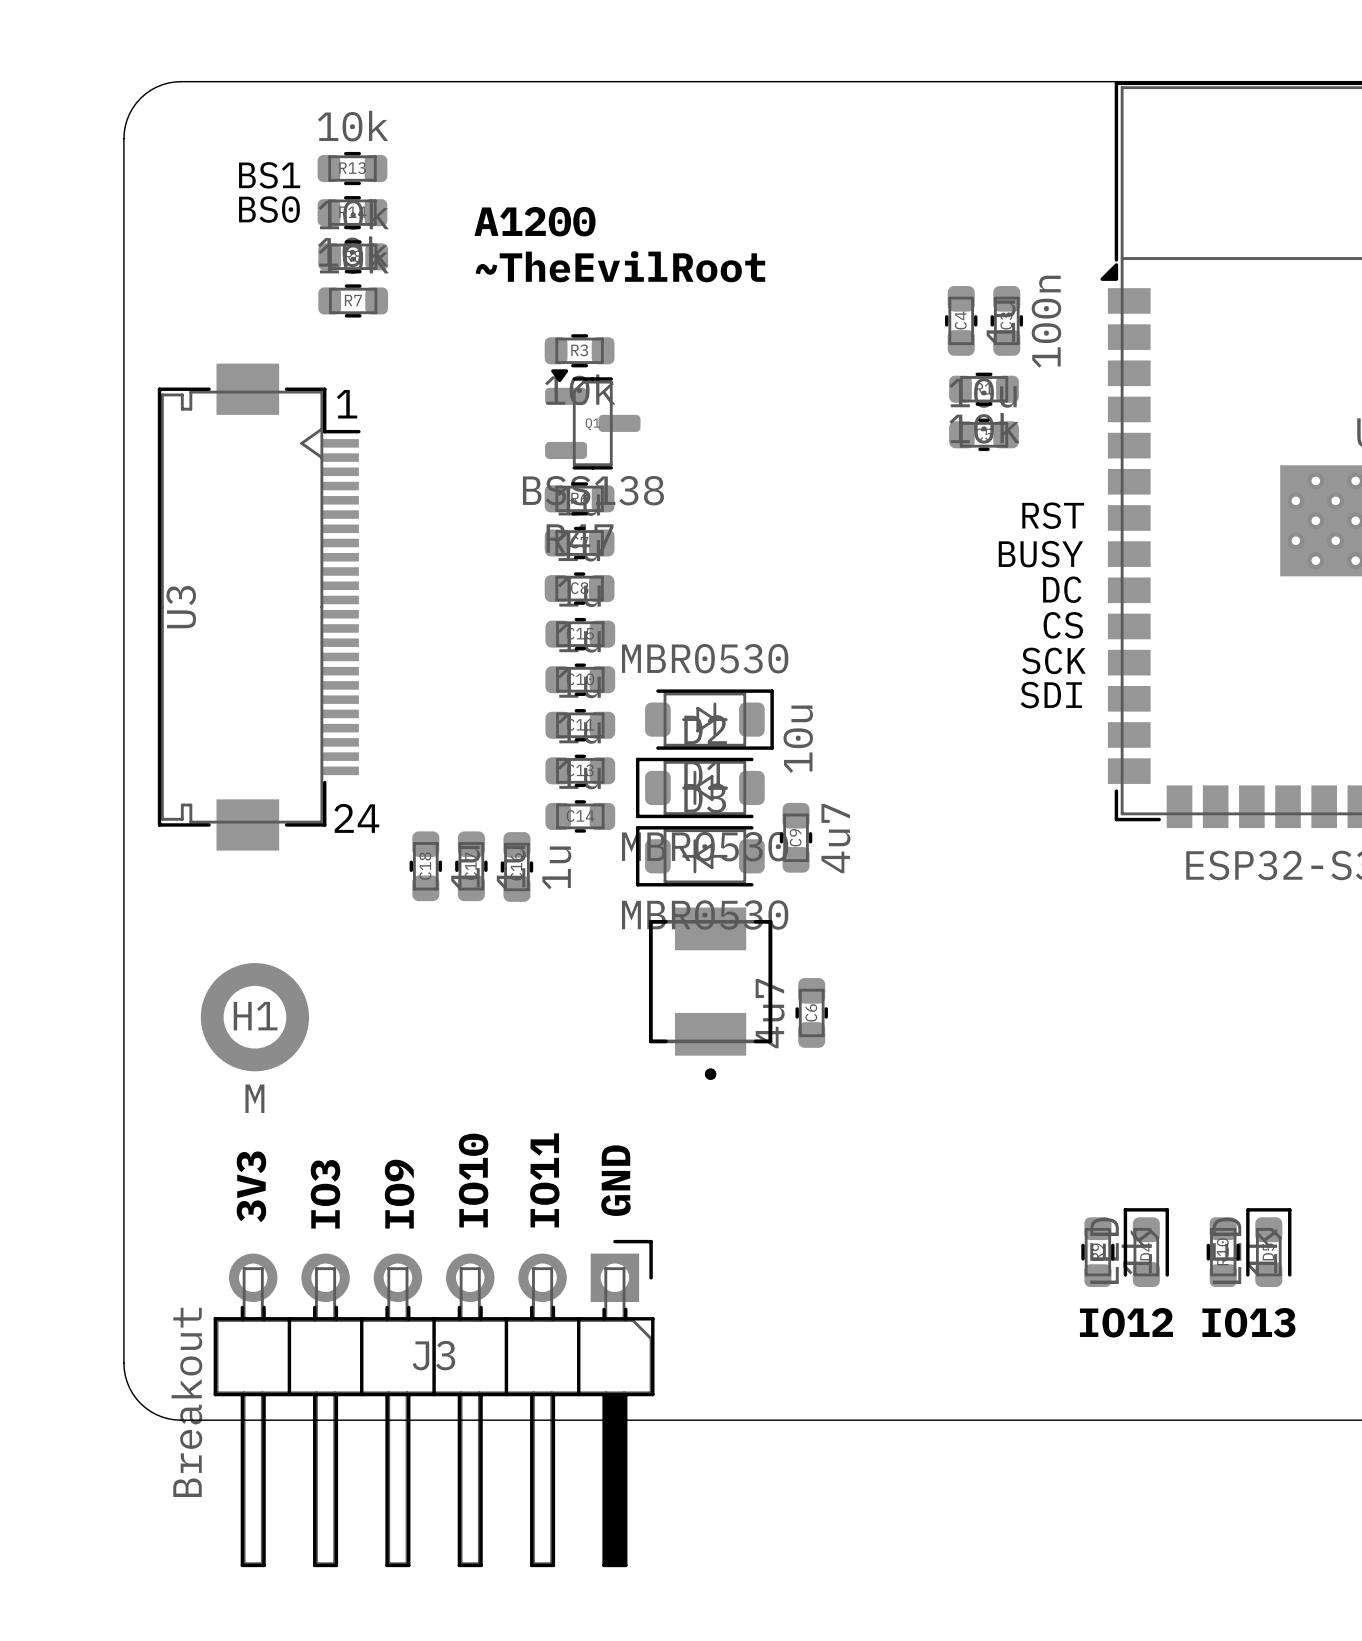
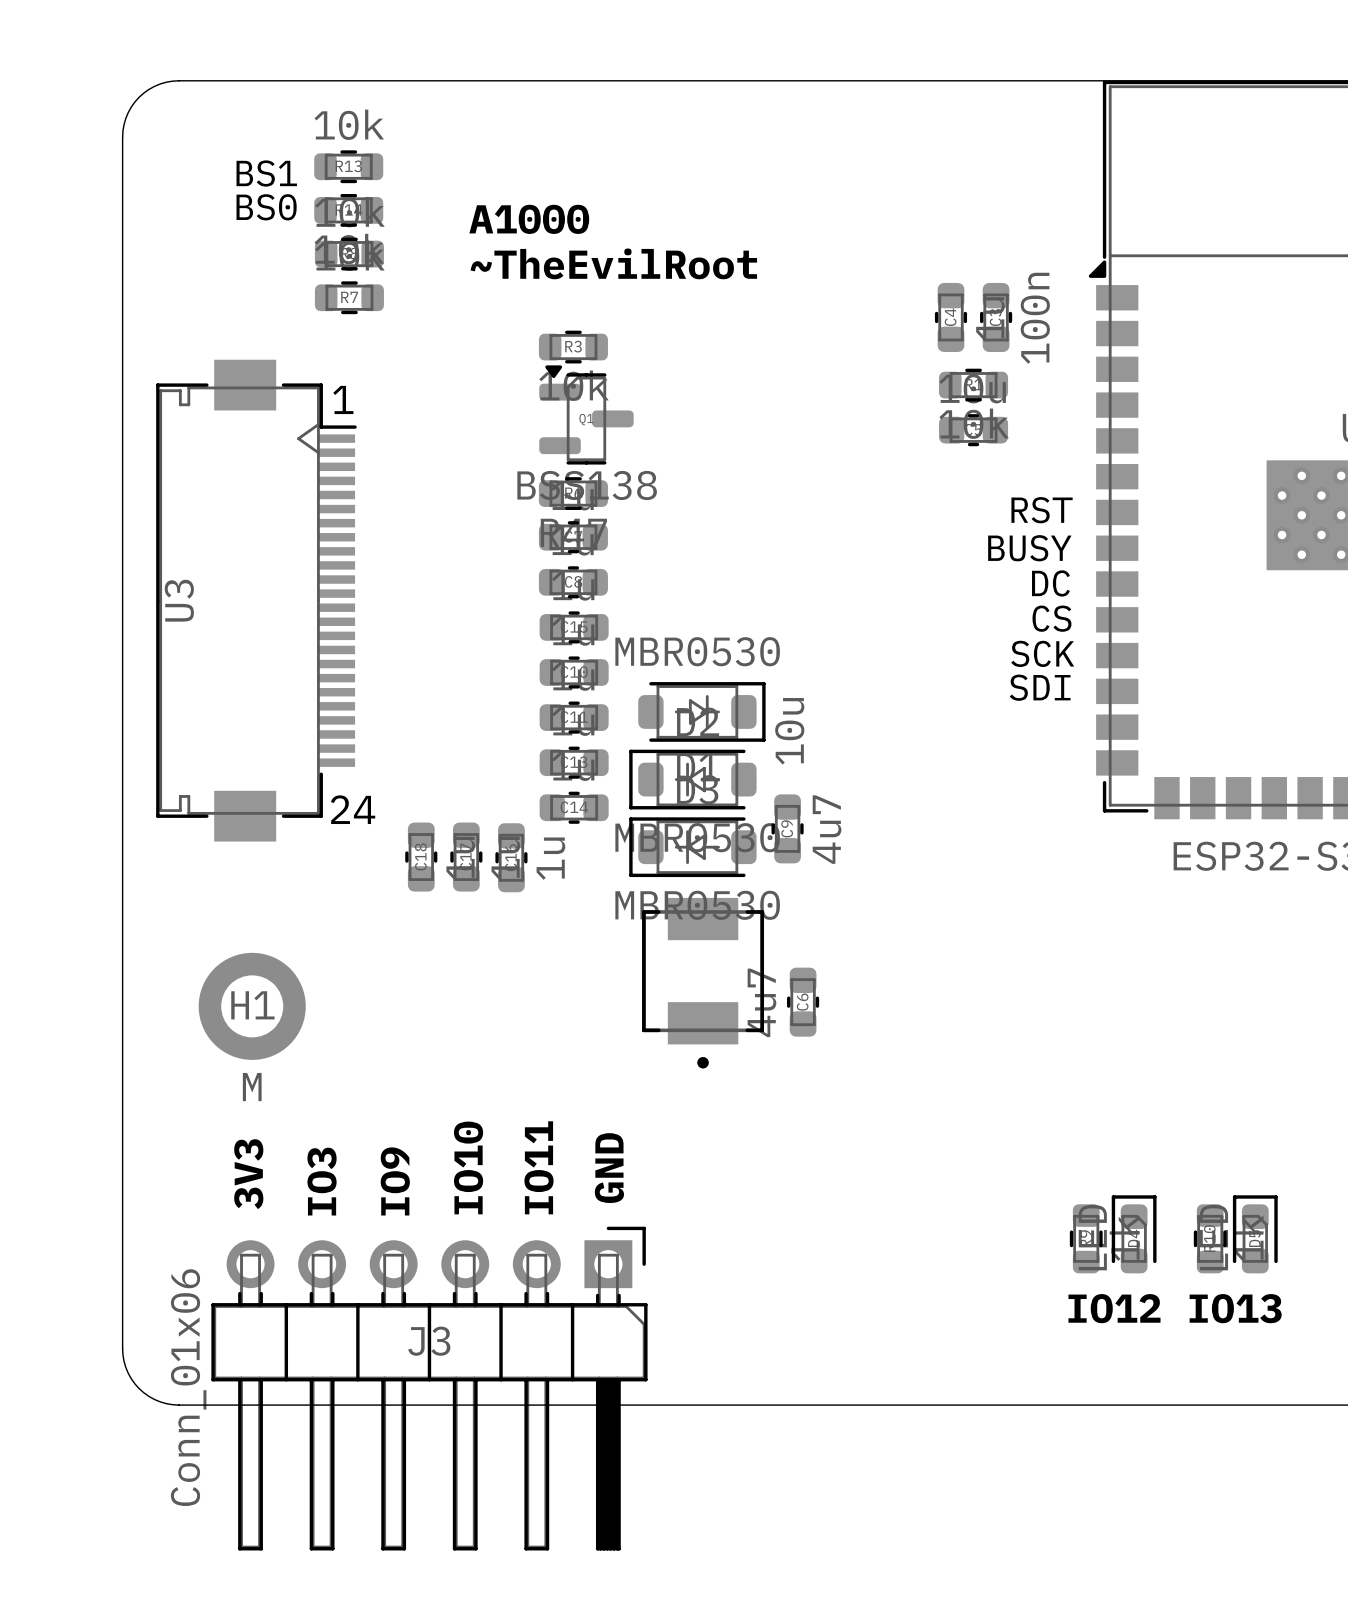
text: A1200 (534, 221) -> A1000 (529, 219)
J3 value: Breakout (186, 1402) -> Conn_01x06 (188, 1387)

